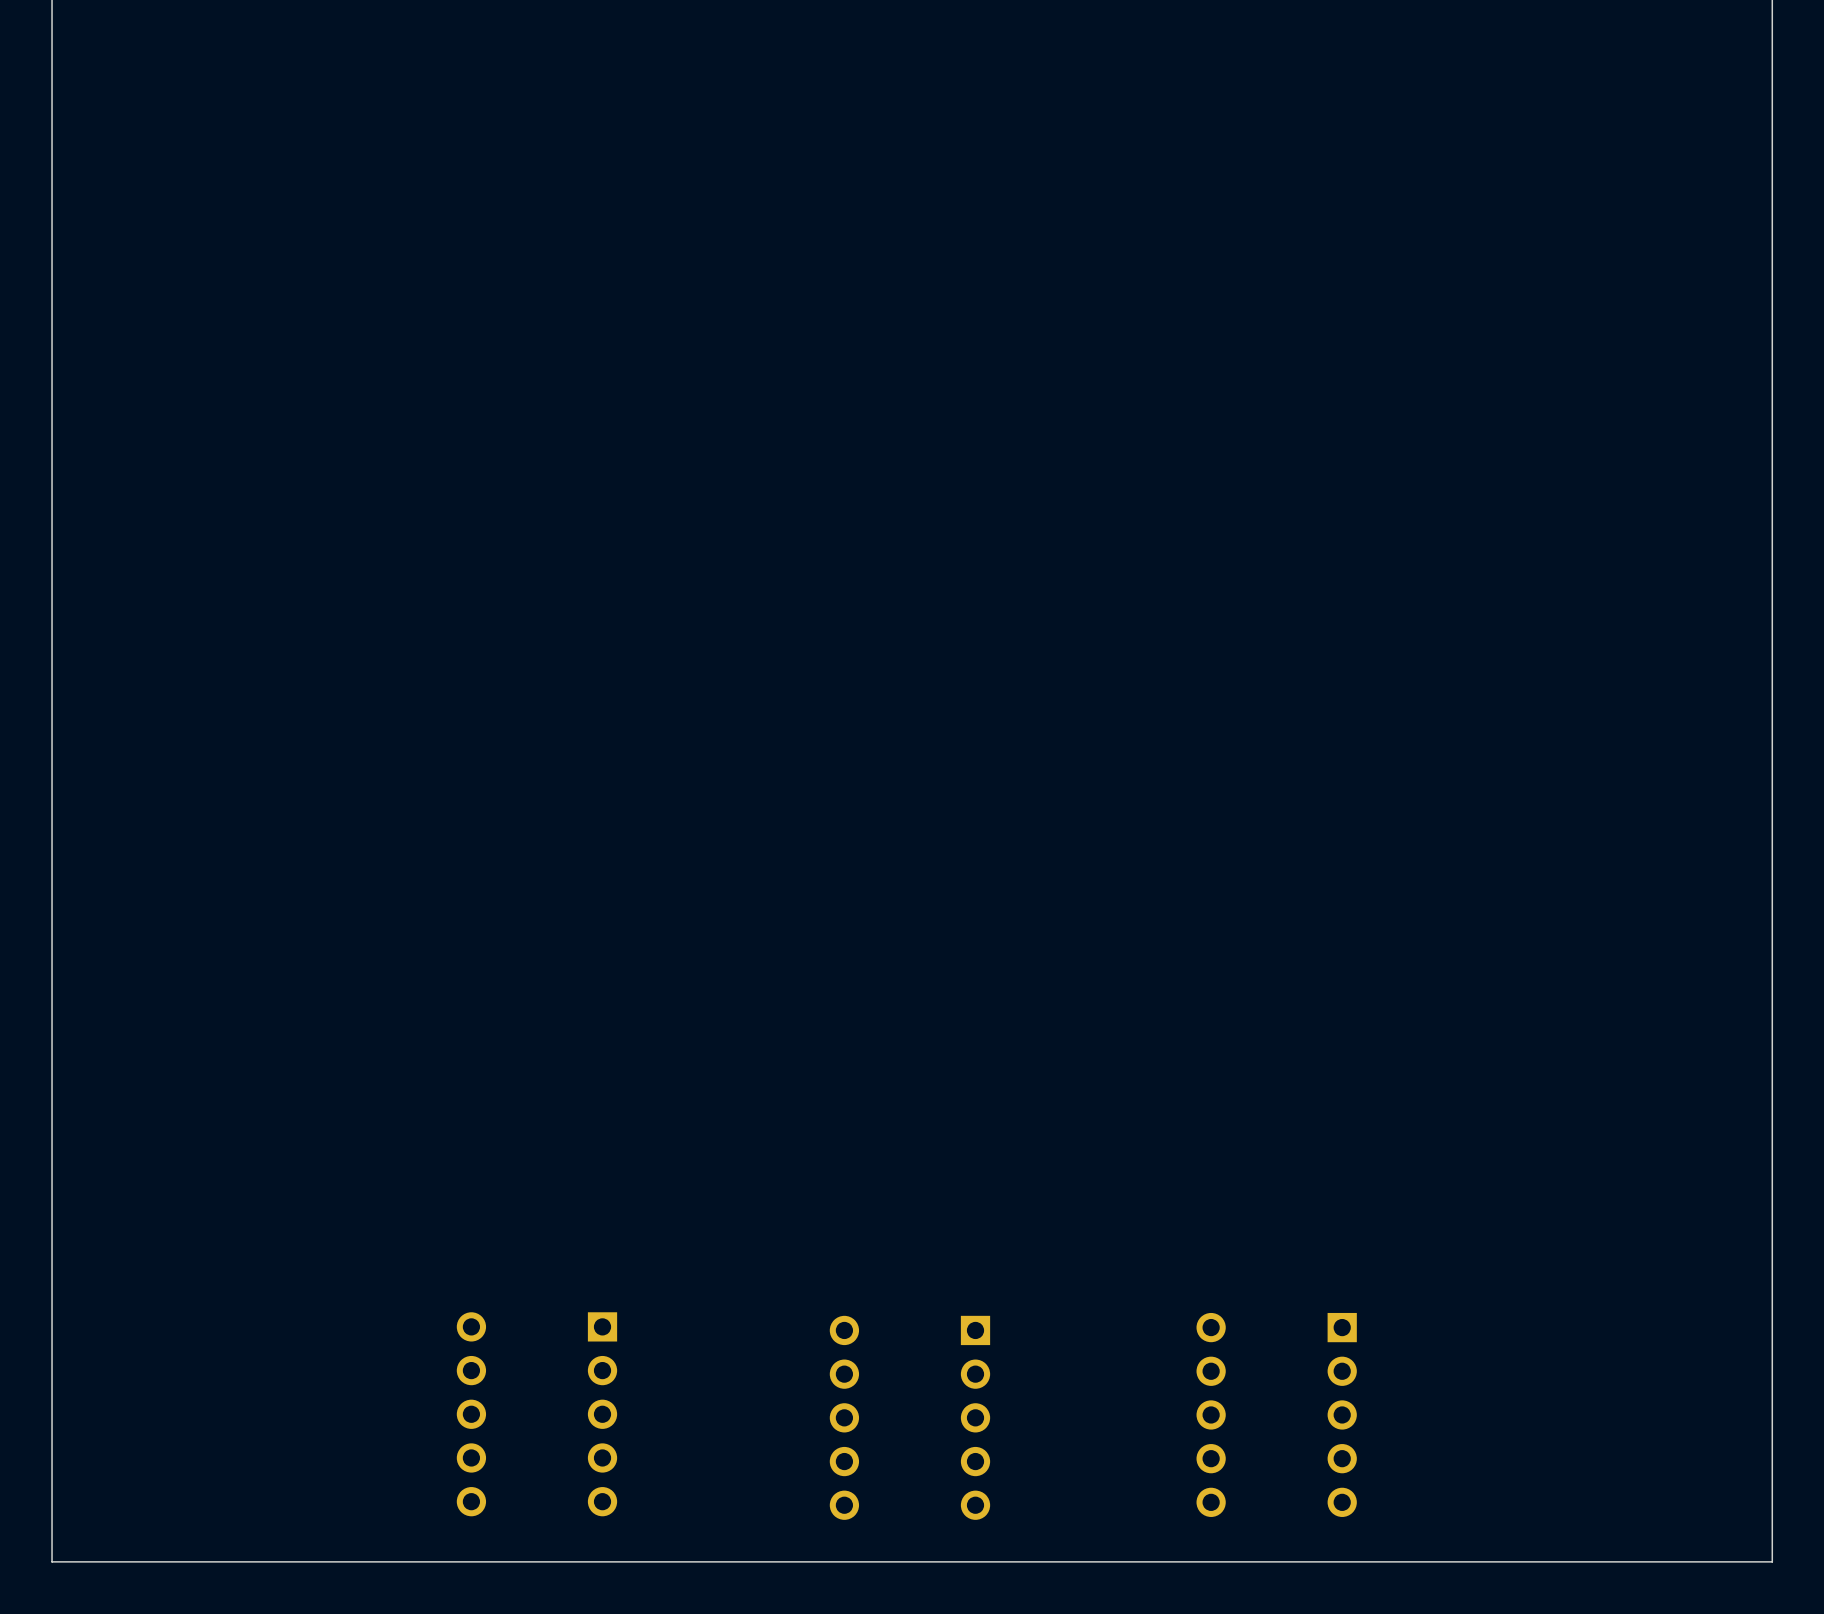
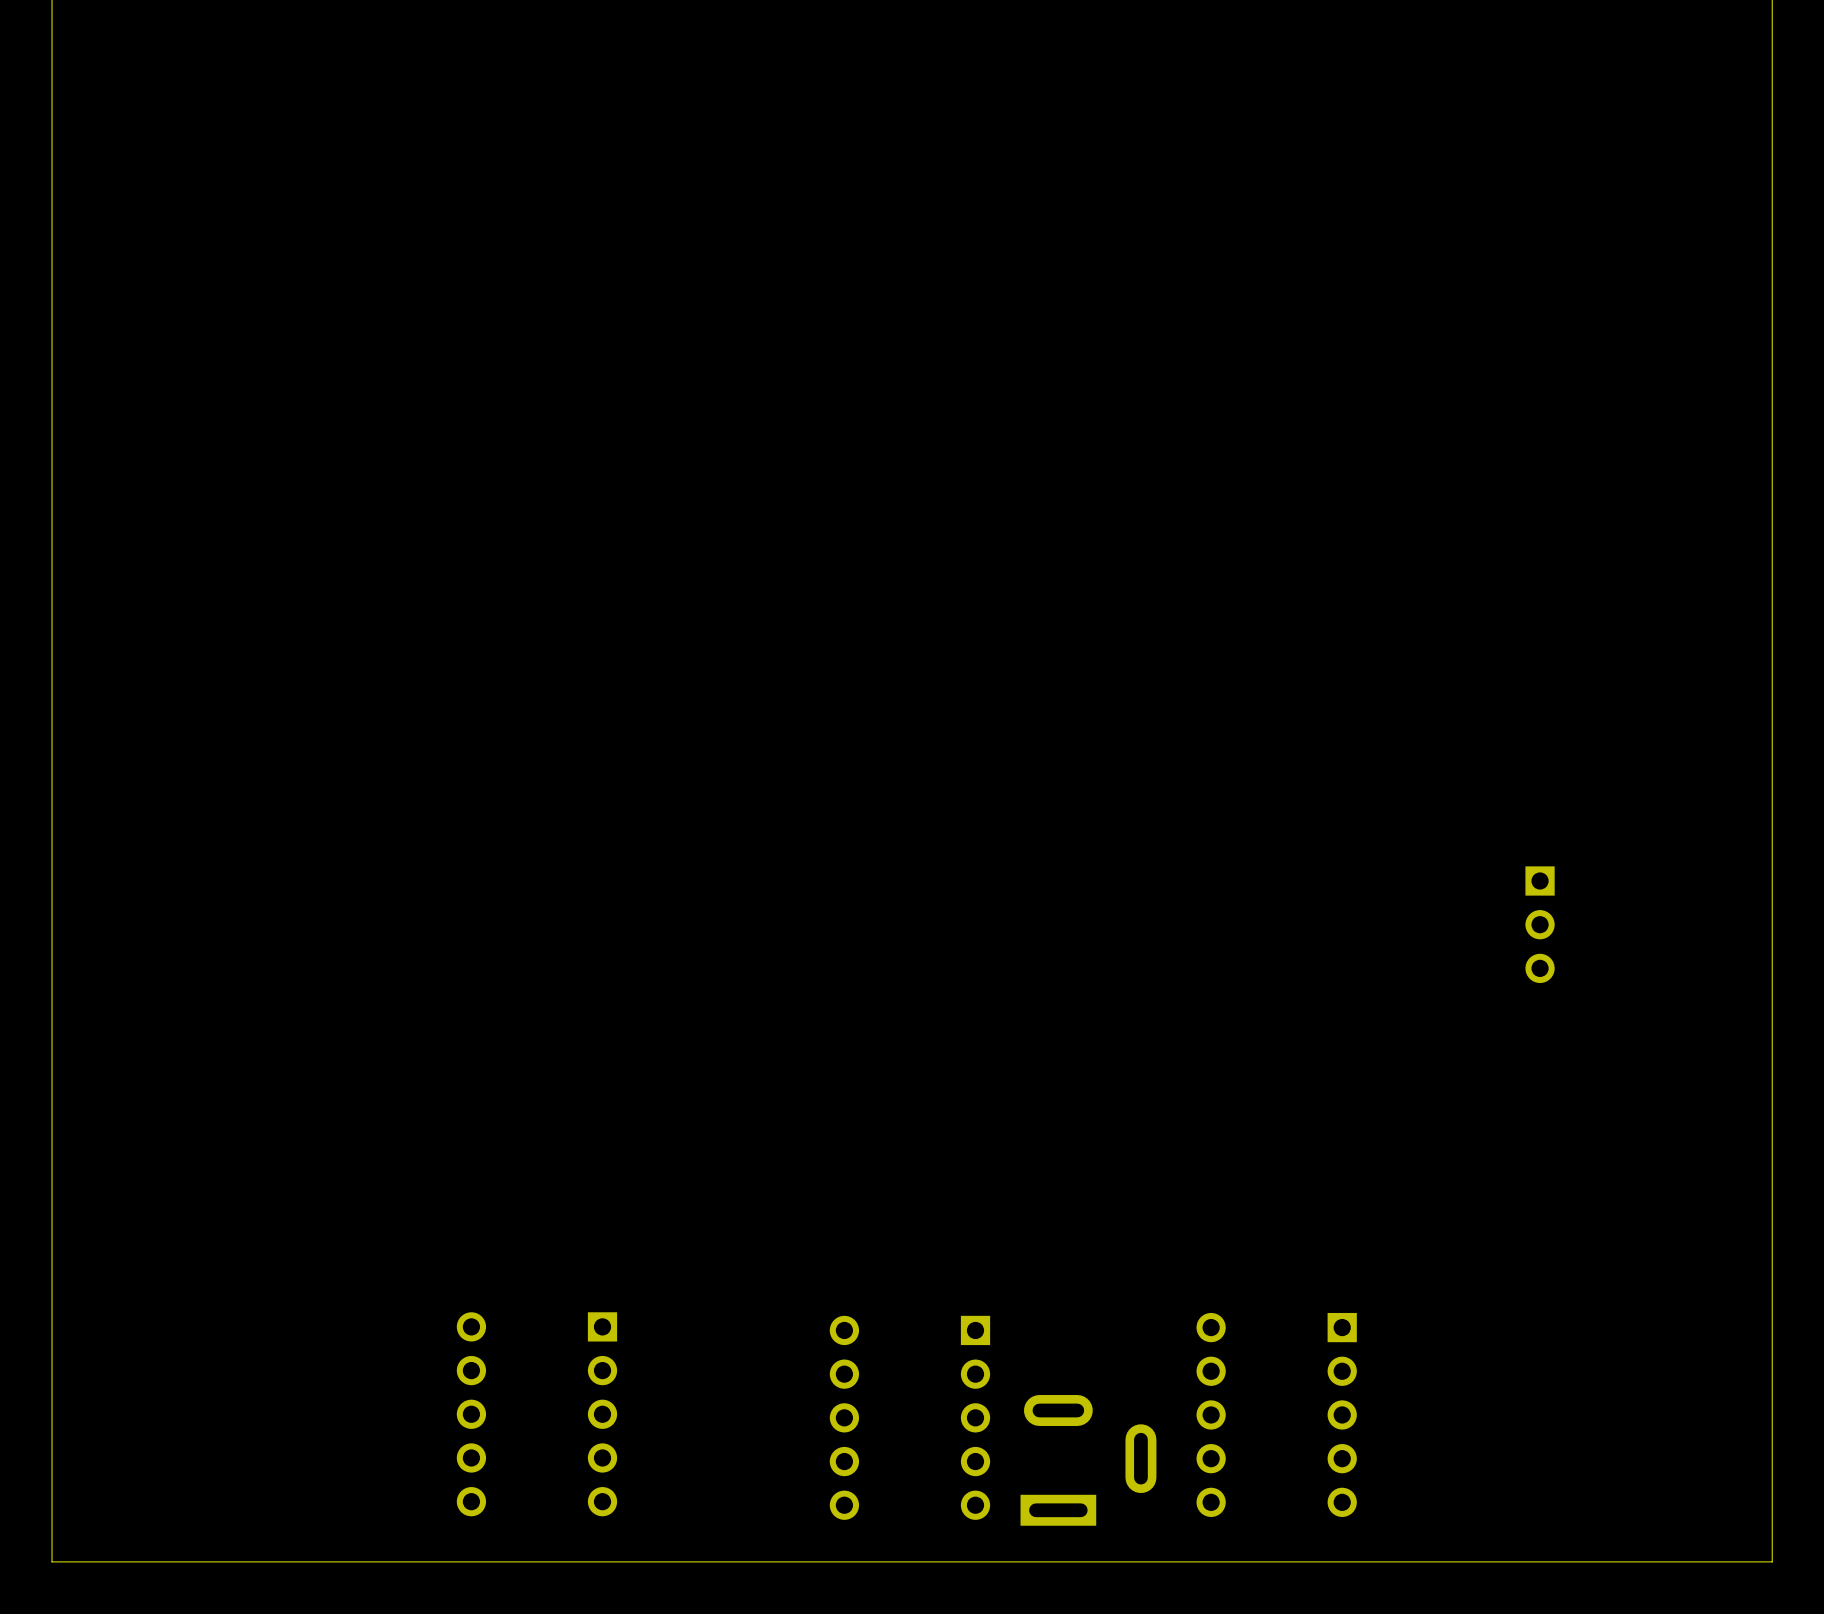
part: none -> (1540, 924)
part: none -> (1088, 1460)

